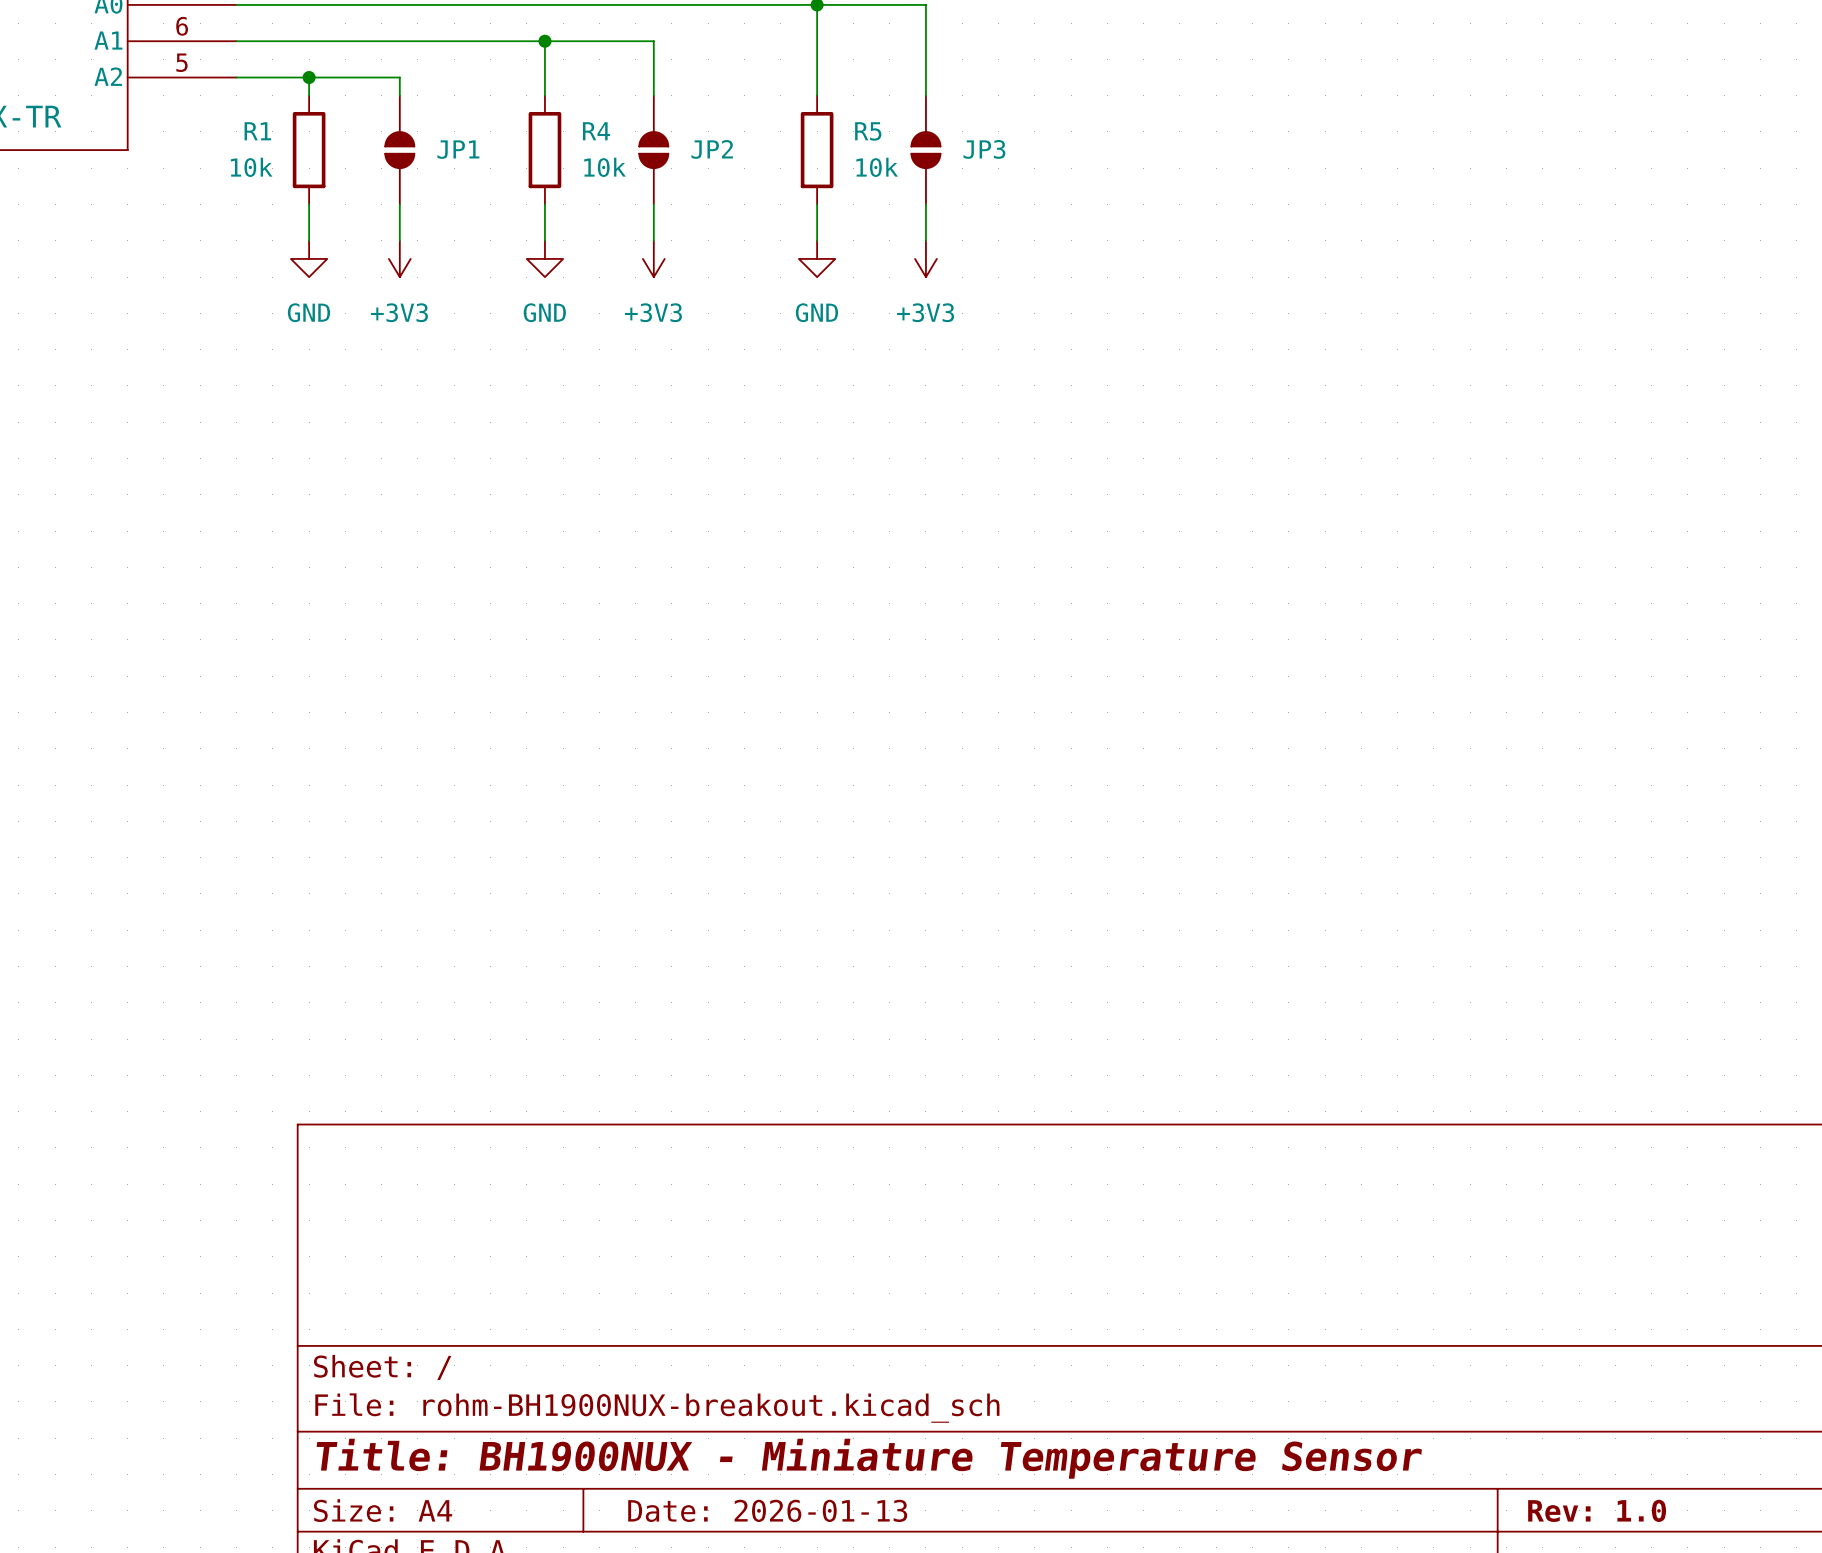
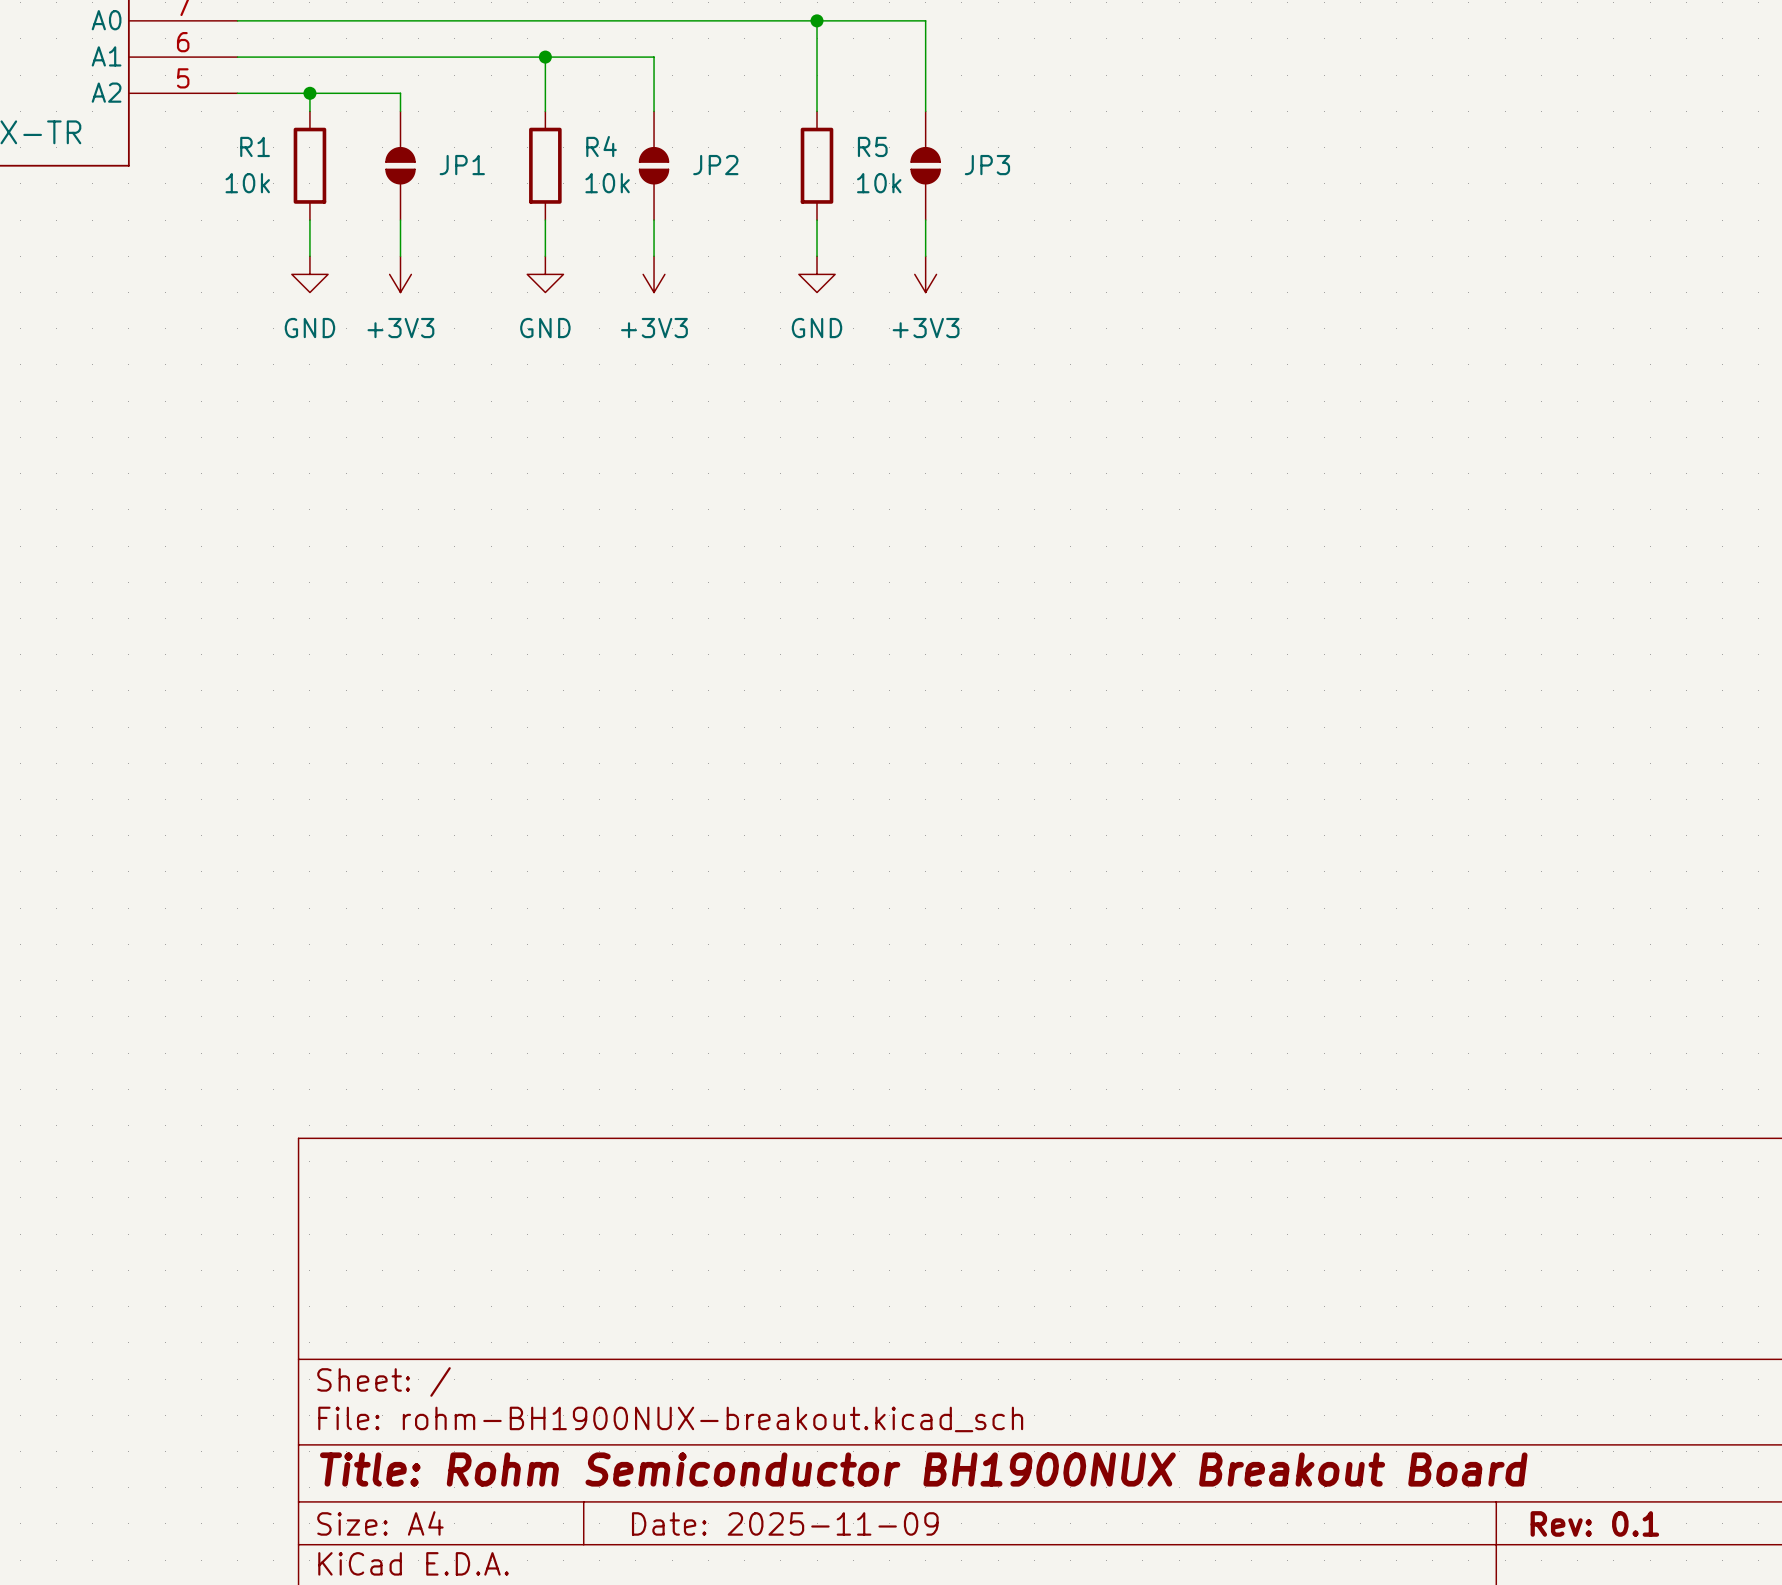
title block: Title: BH1900NUX - Miniature Temperature Sensor (869, 1458) -> Title: Rohm Semiconductor BH1900NUX Breakout Board (923, 1469)
title block: Date: 2026-01-13 (767, 1510) -> Date: 2025-11-09 (785, 1523)
title block: Rev: 1.0 (1597, 1510) -> Rev: 0.1 (1594, 1523)

